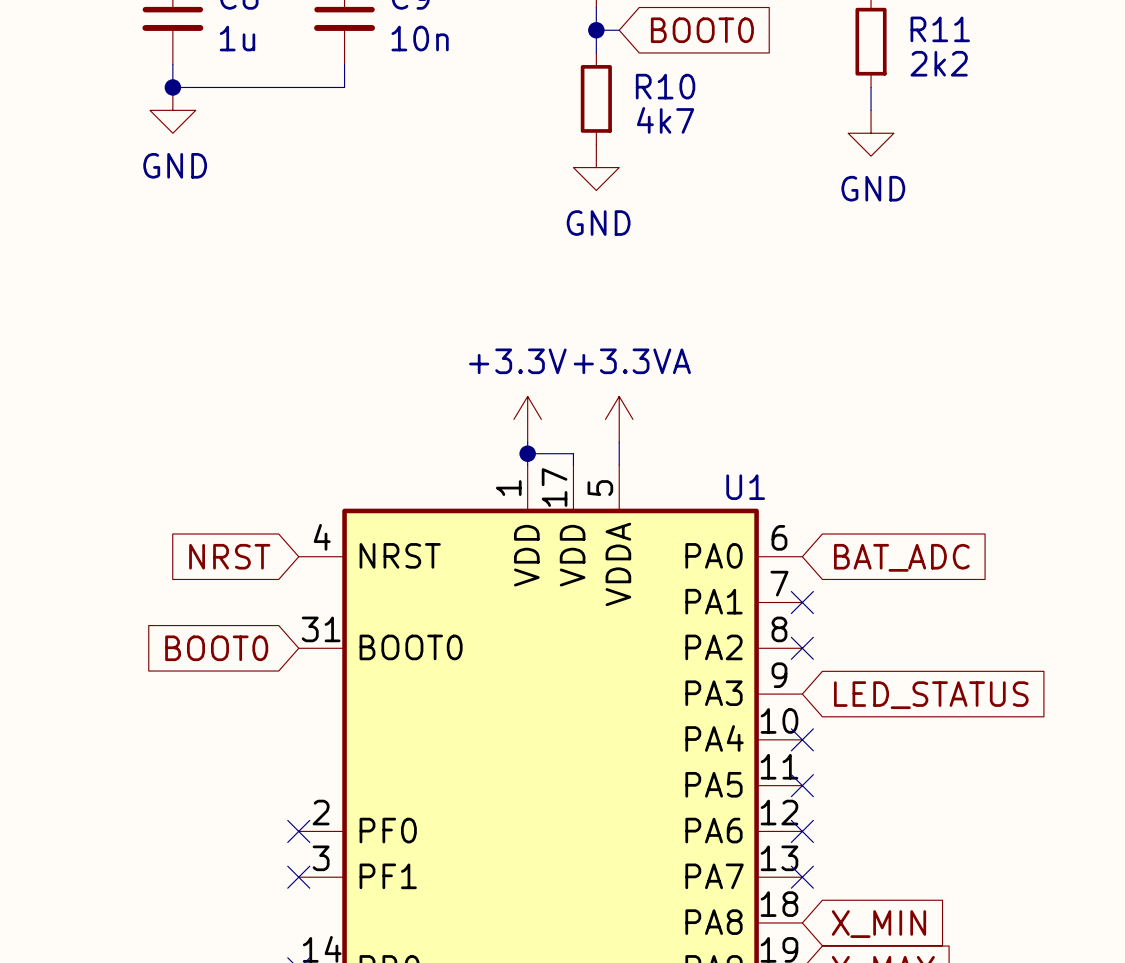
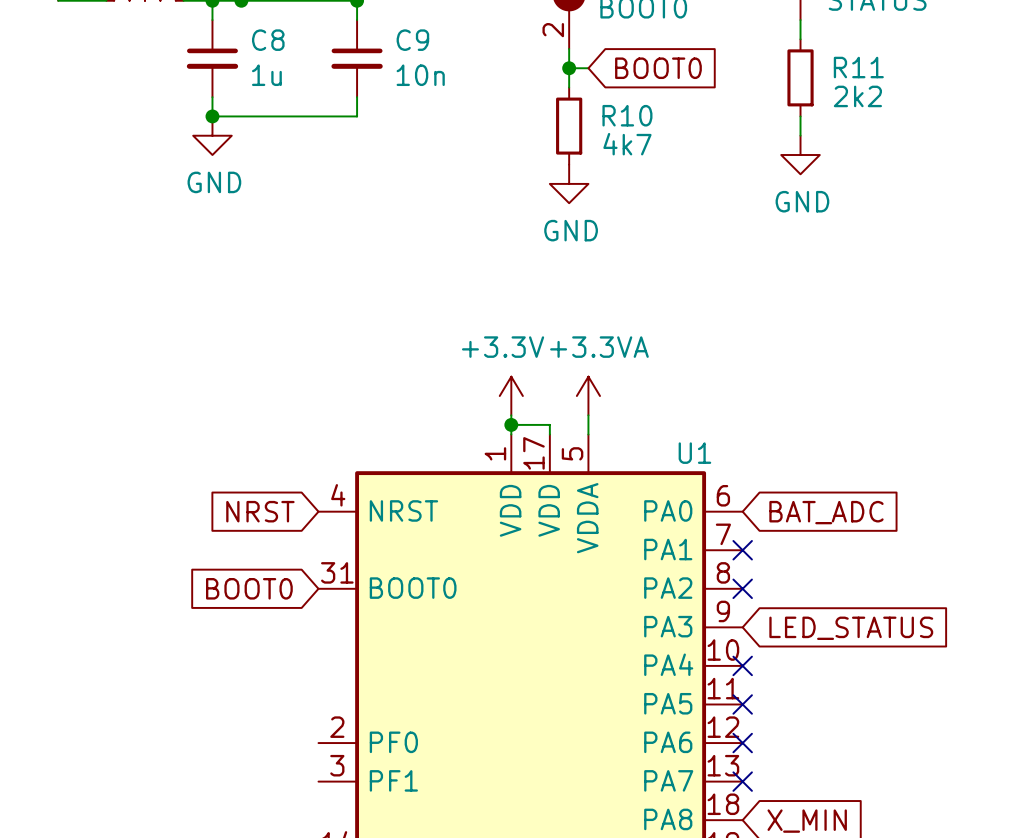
no-connect mark: (298, 831) -> none
no-connect mark: (298, 877) -> none

